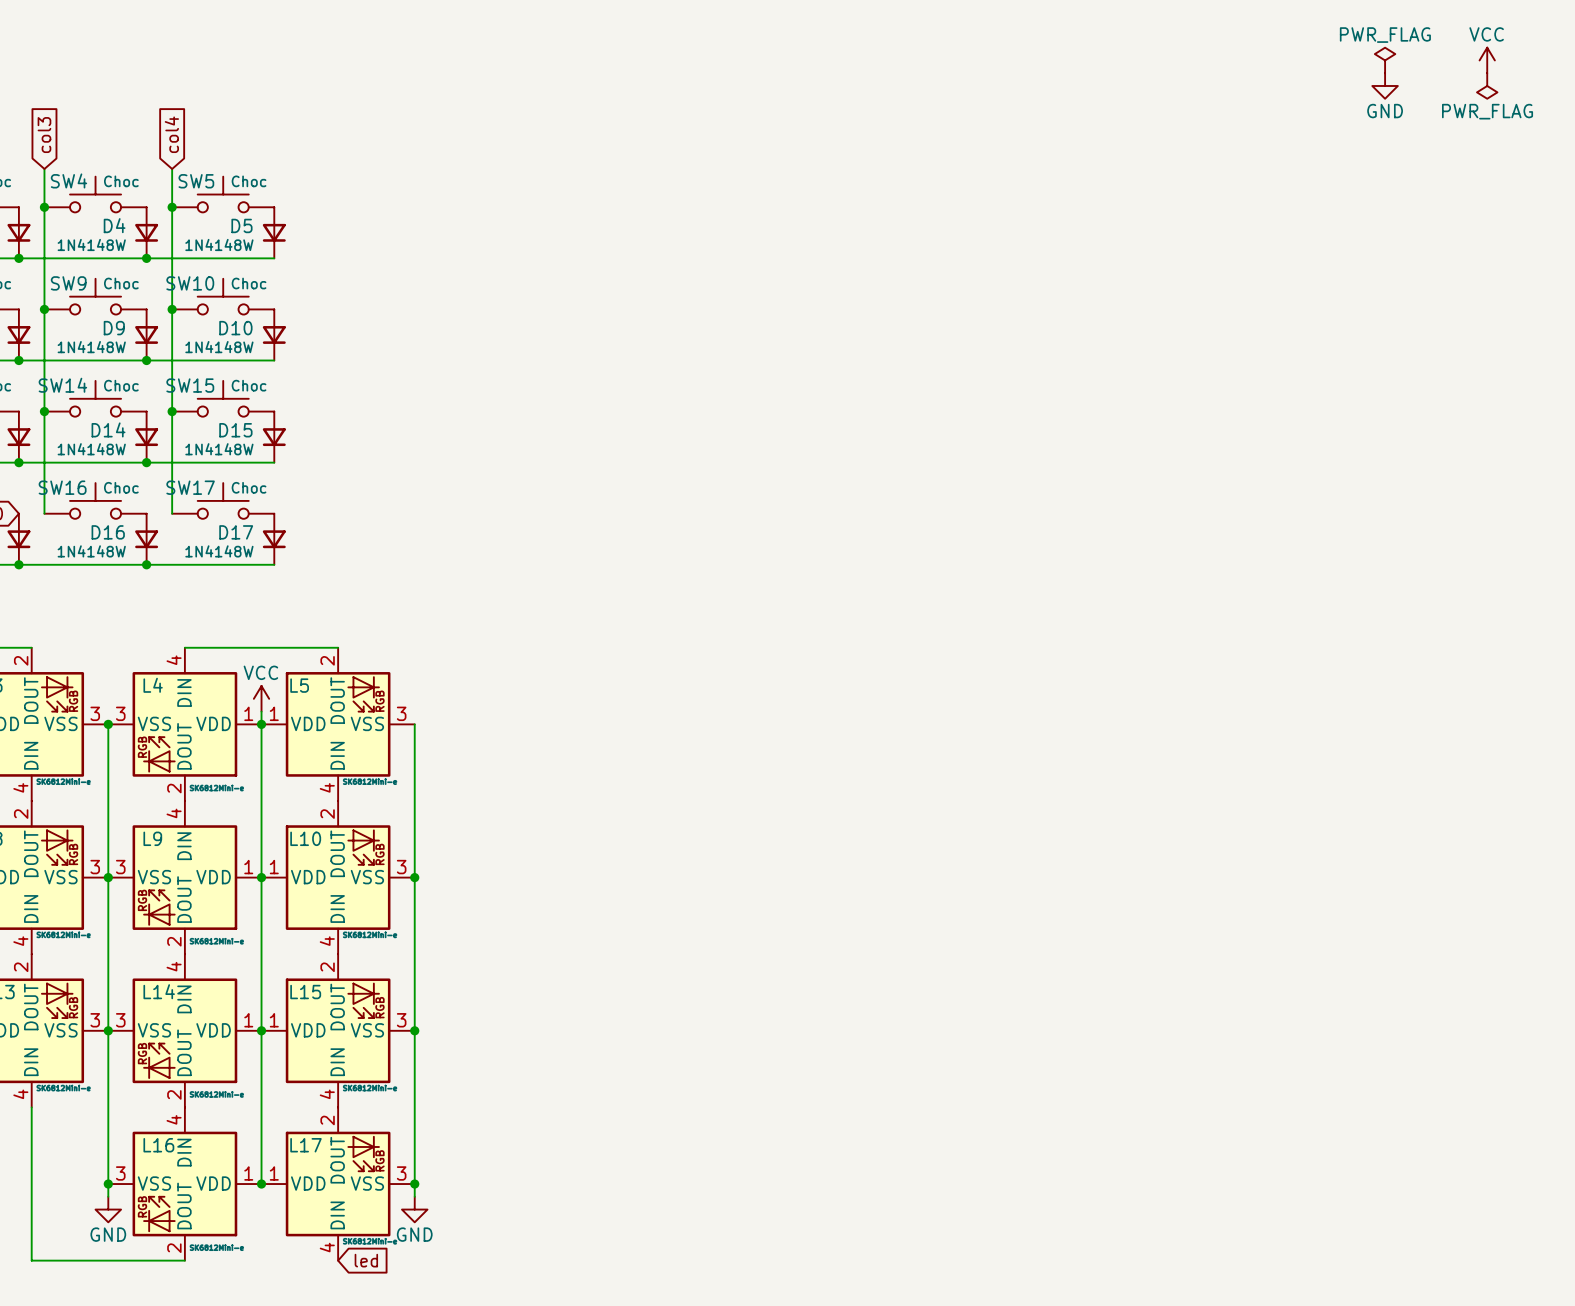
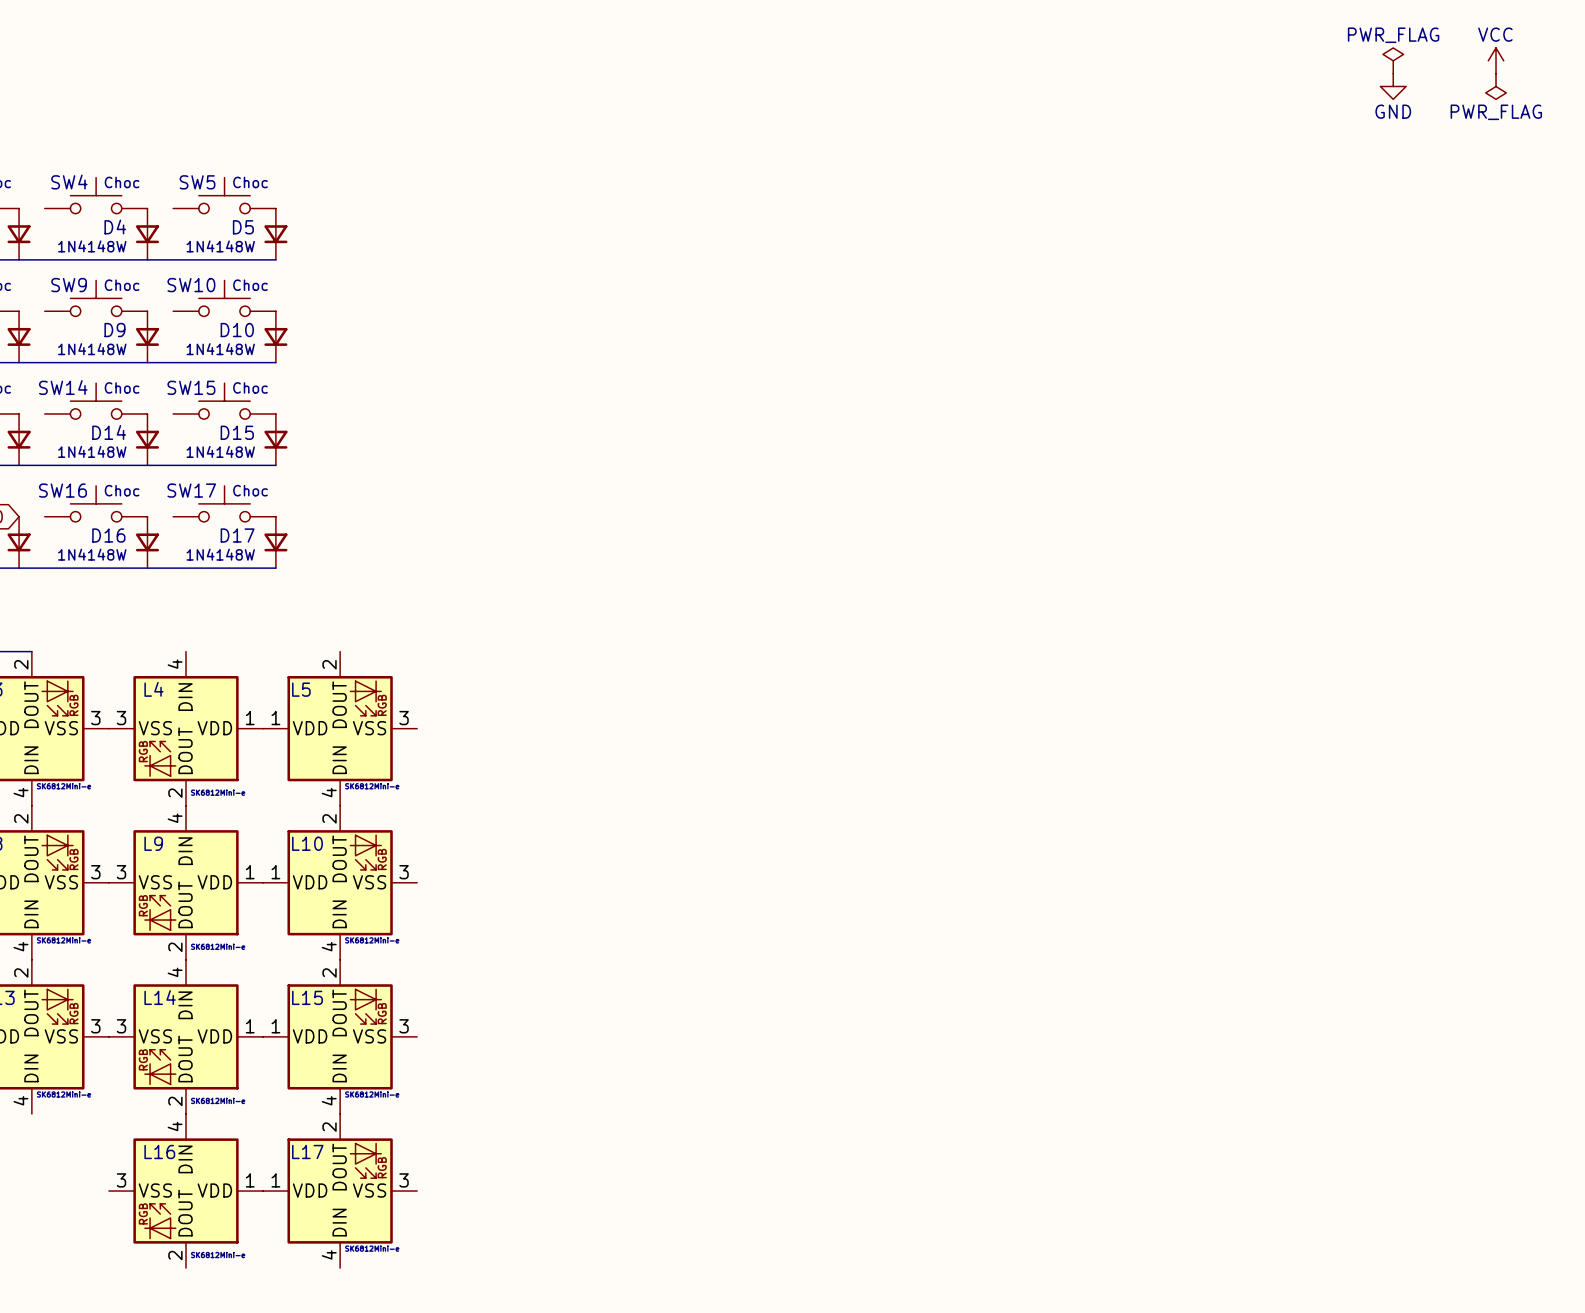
global label: col4 (171, 134) -> none
global label: col3 (44, 135) -> none
wire: (44, 168) (44, 513) -> none
wire: (172, 168) (172, 513) -> none
junction: (44, 207) -> none
junction: (172, 207) -> none
junction: (18, 258) -> none
junction: (146, 258) -> none
junction: (44, 309) -> none
junction: (172, 309) -> none
junction: (18, 360) -> none
junction: (146, 360) -> none
junction: (44, 411) -> none
junction: (172, 411) -> none
junction: (18, 462) -> none
junction: (146, 462) -> none
junction: (18, 564) -> none
junction: (146, 564) -> none
wire: (184, 647) (338, 647) -> none
power symbol: VCC (261, 698) -> none
wire: (261, 711) (261, 1184) -> none
wire: (108, 724) (108, 1196) -> none
junction: (108, 724) -> none
junction: (261, 724) -> none
wire: (414, 724) (414, 1196) -> none
junction: (108, 877) -> none
junction: (261, 877) -> none
junction: (414, 877) -> none
junction: (108, 1030) -> none
junction: (261, 1030) -> none
junction: (414, 1030) -> none
wire: (31, 1107) (31, 1260) (184, 1260) -> none
junction: (108, 1184) -> none
junction: (261, 1184) -> none
junction: (414, 1184) -> none
power symbol: GND (108, 1209) -> none
power symbol: GND (414, 1209) -> none
global label: led (366, 1260) -> none

